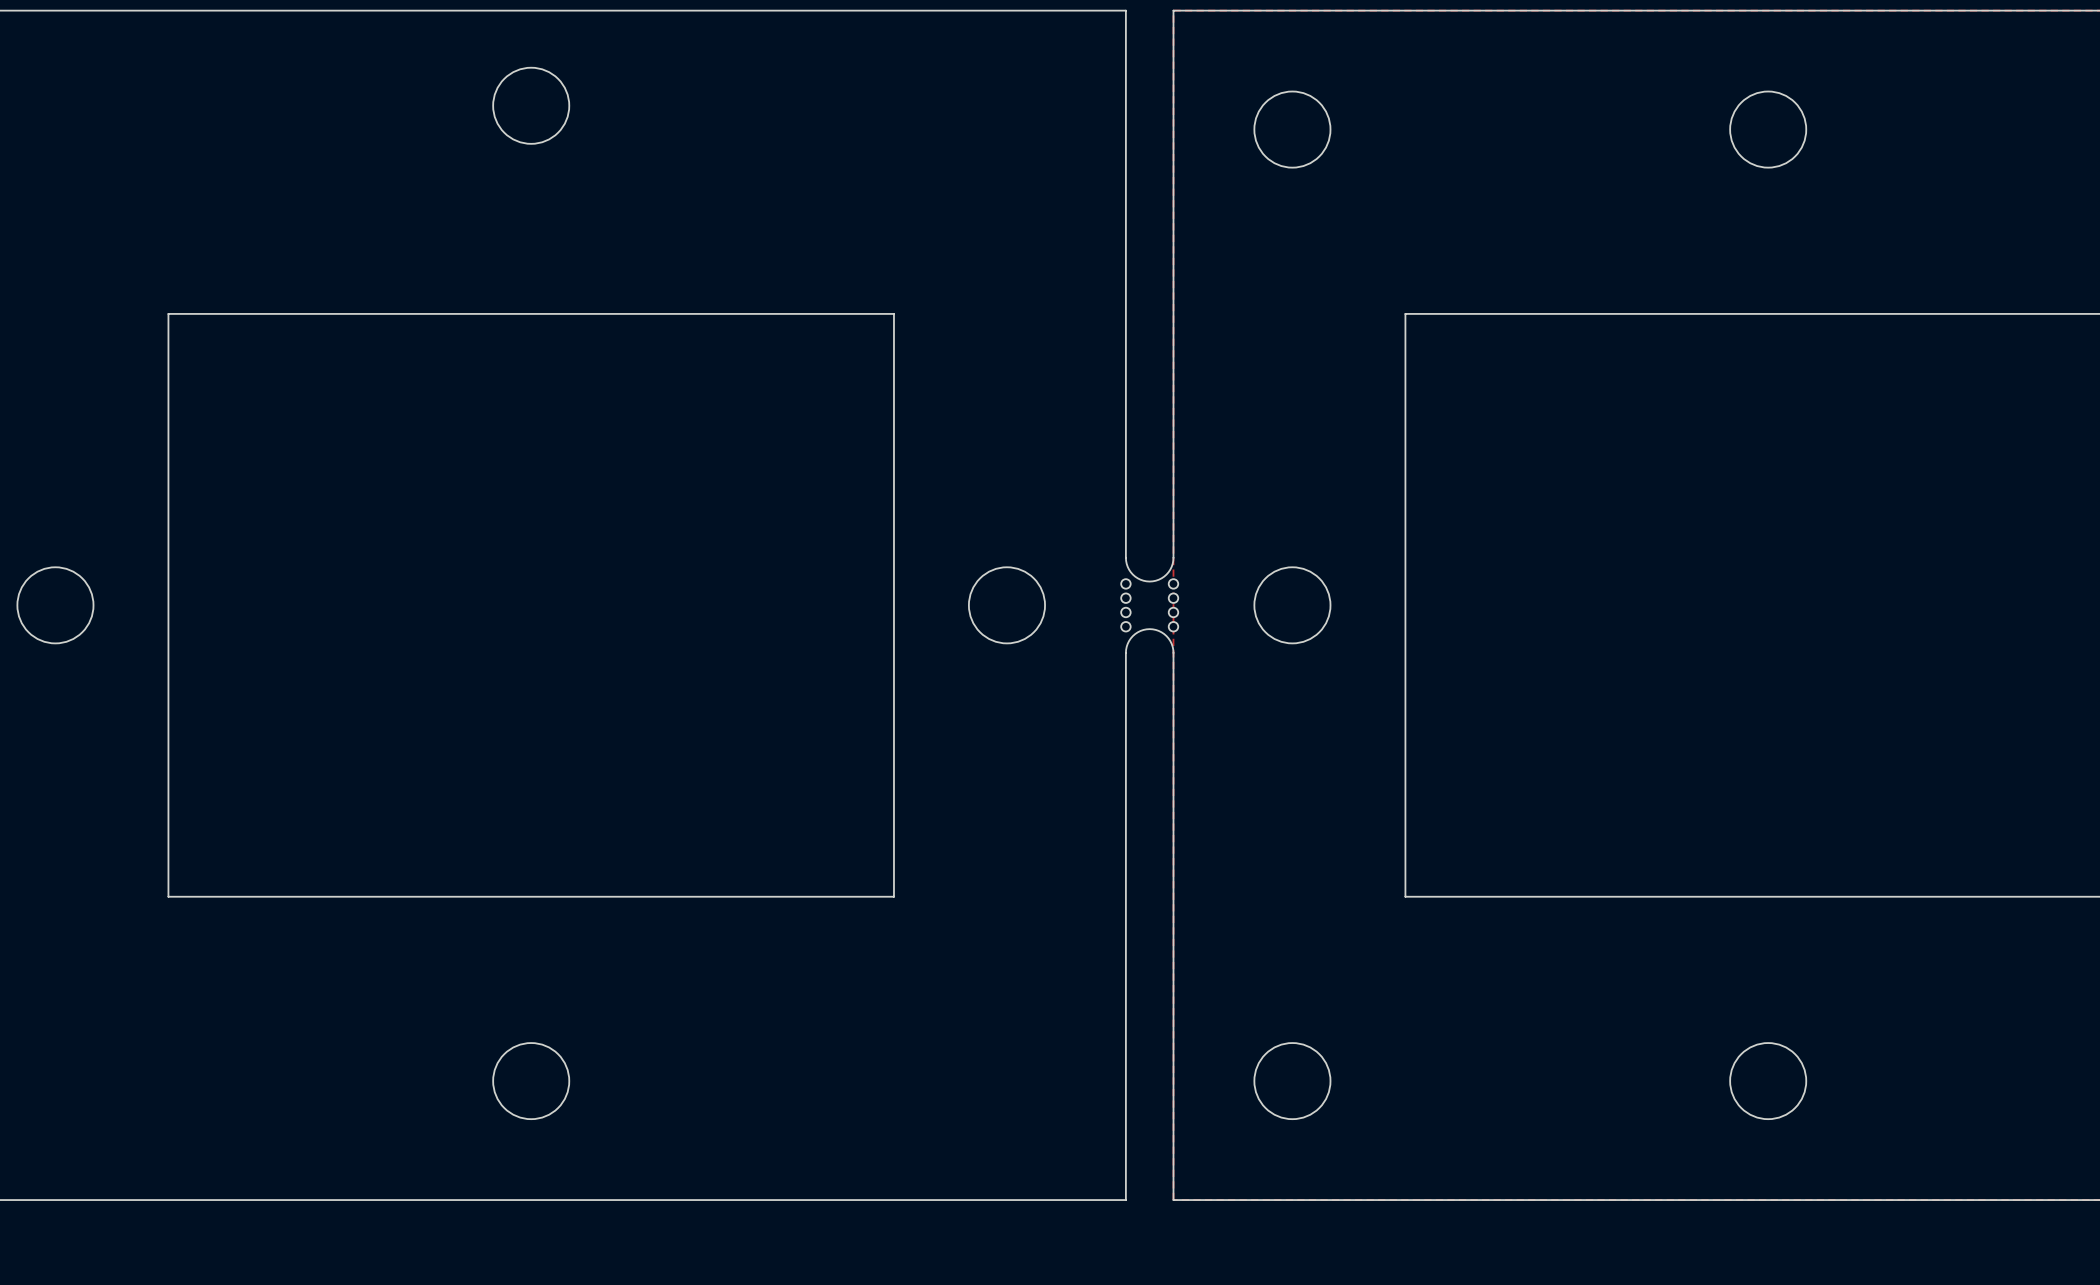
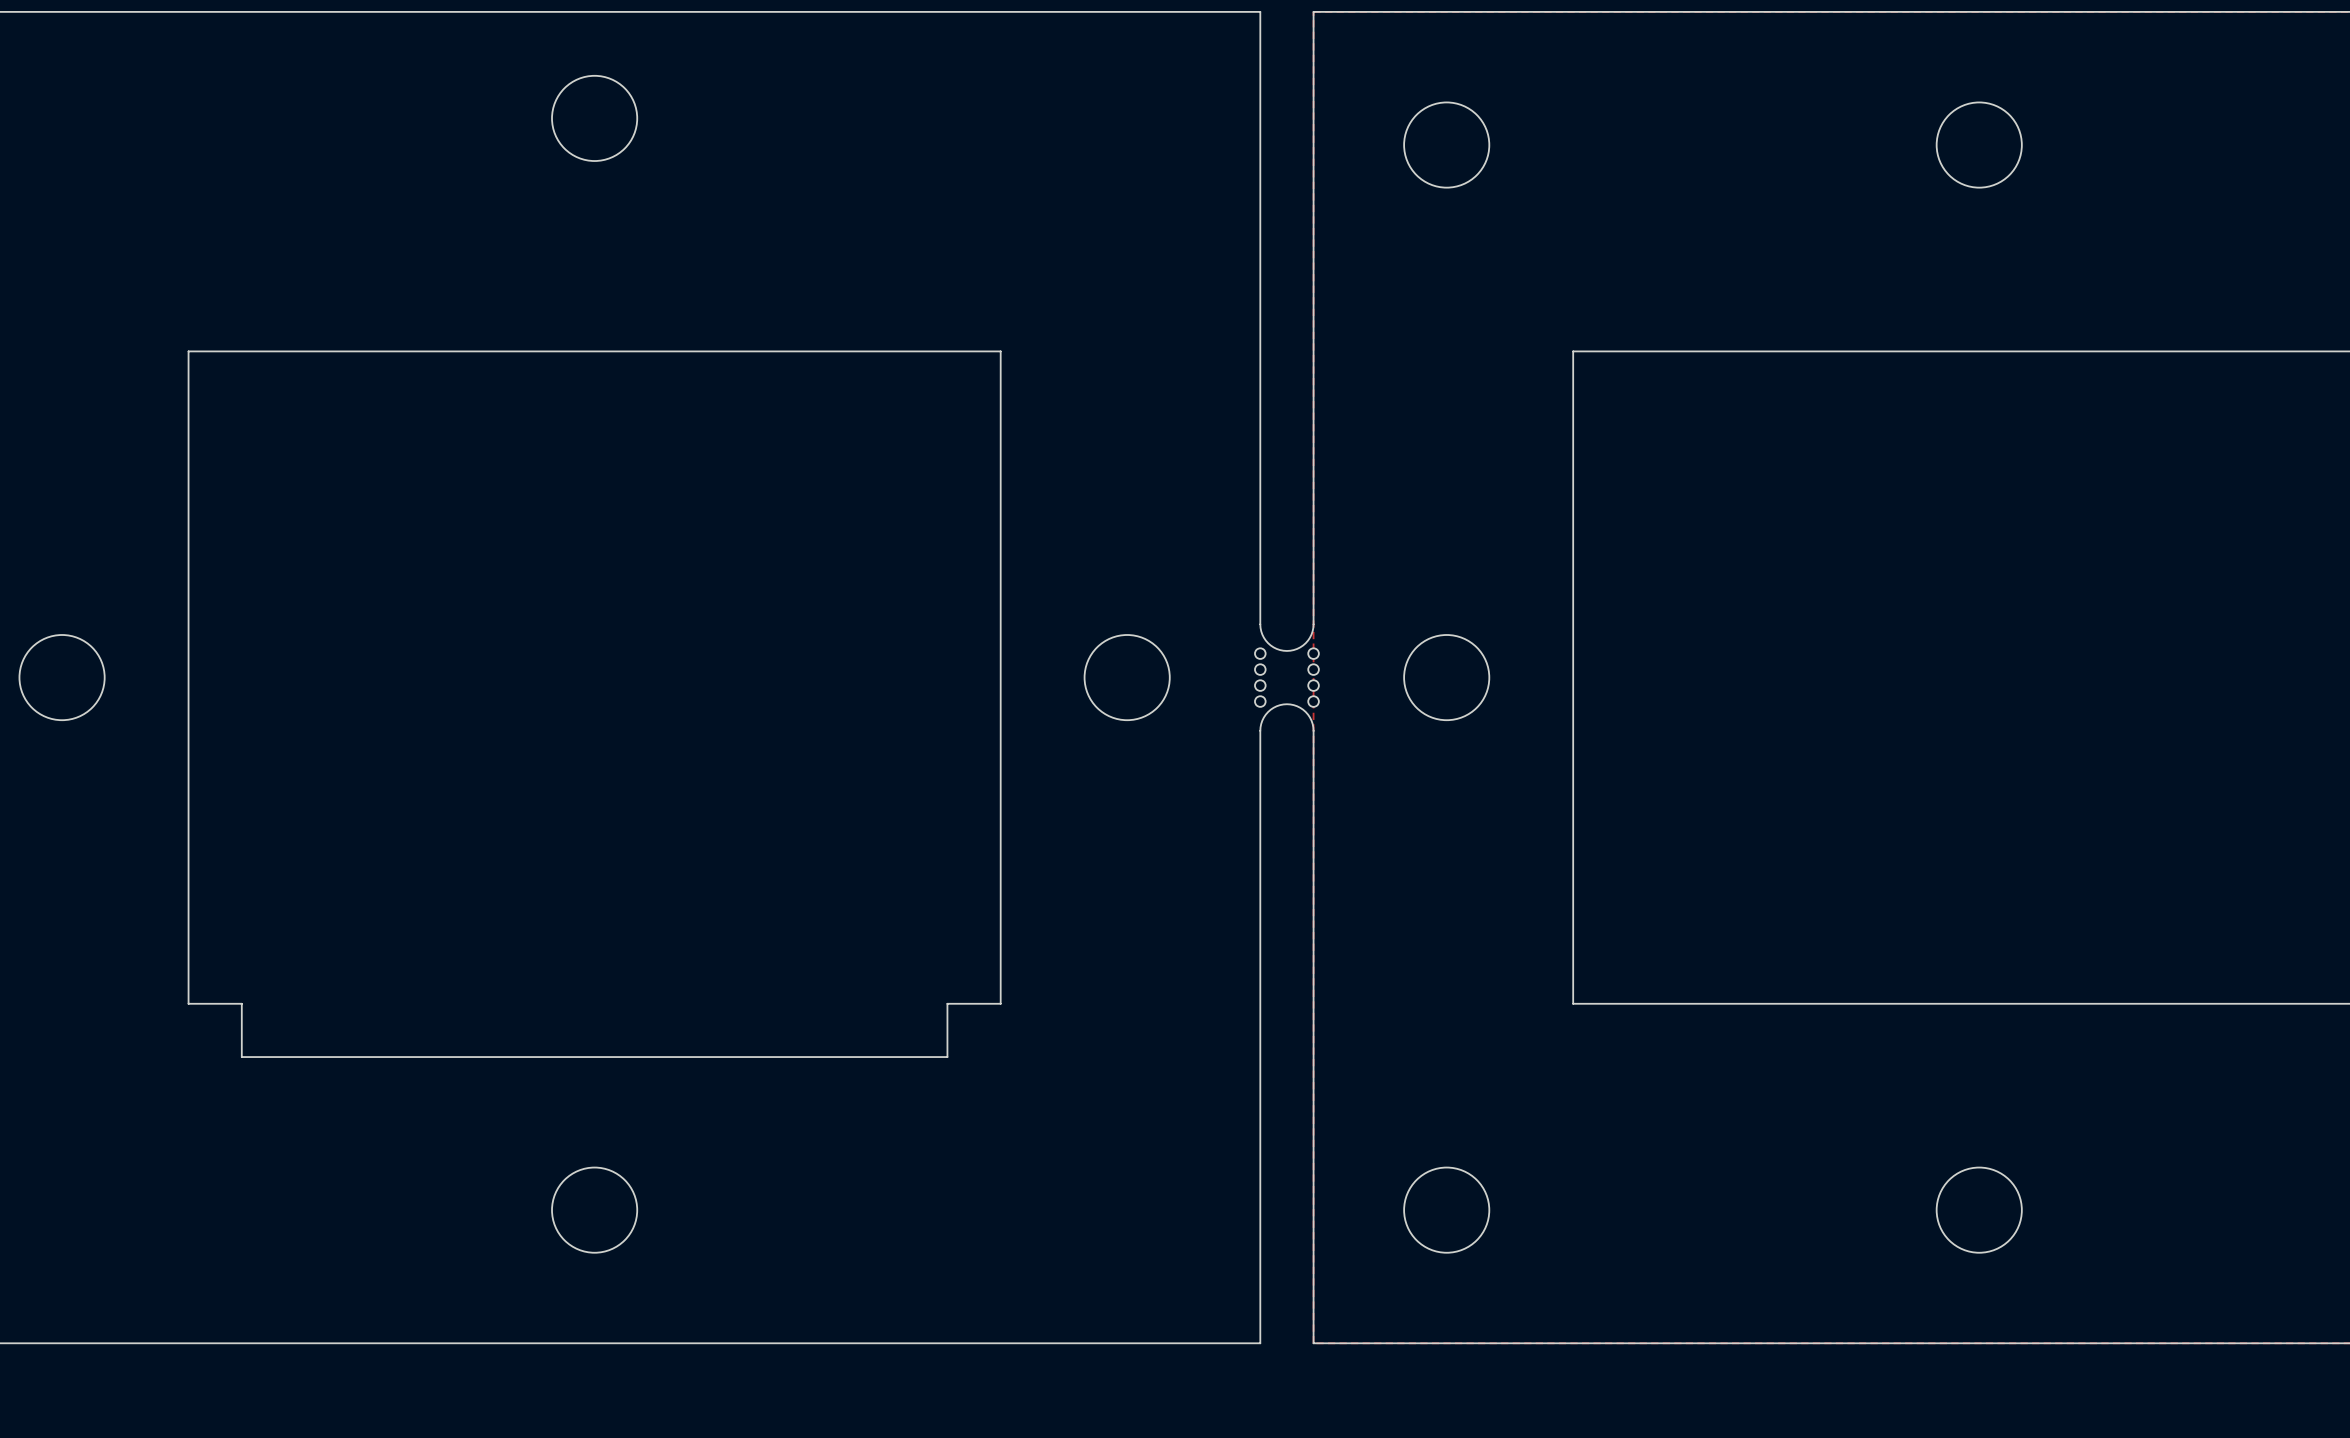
board edge: (216, 896) (846, 896) -> (241, 1003) (241, 1057) (947, 1057) (947, 1003)

